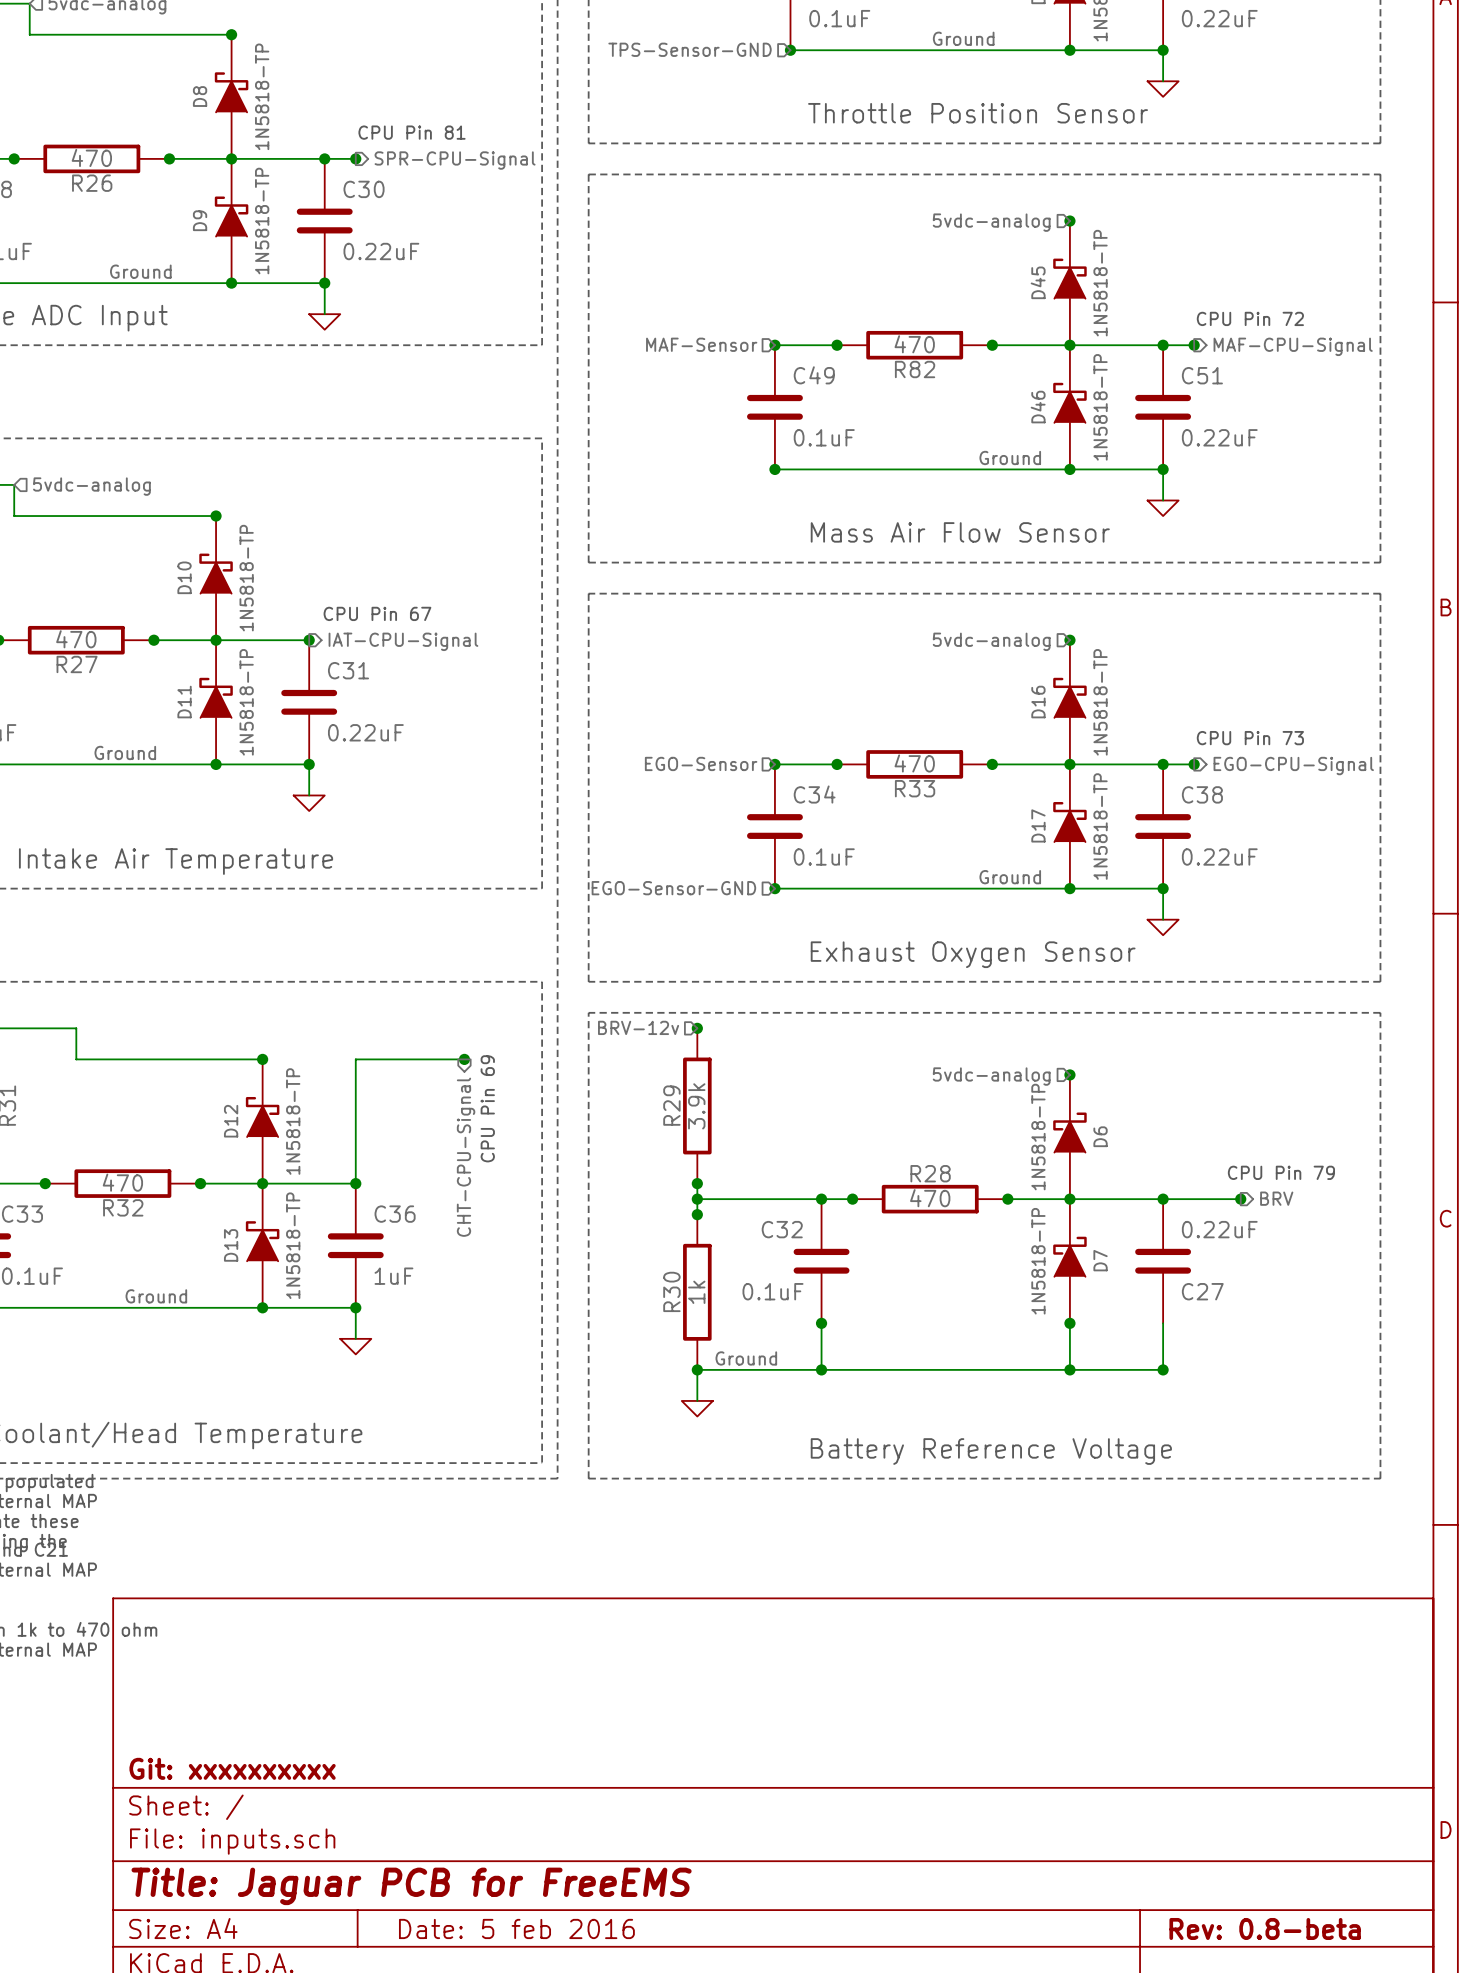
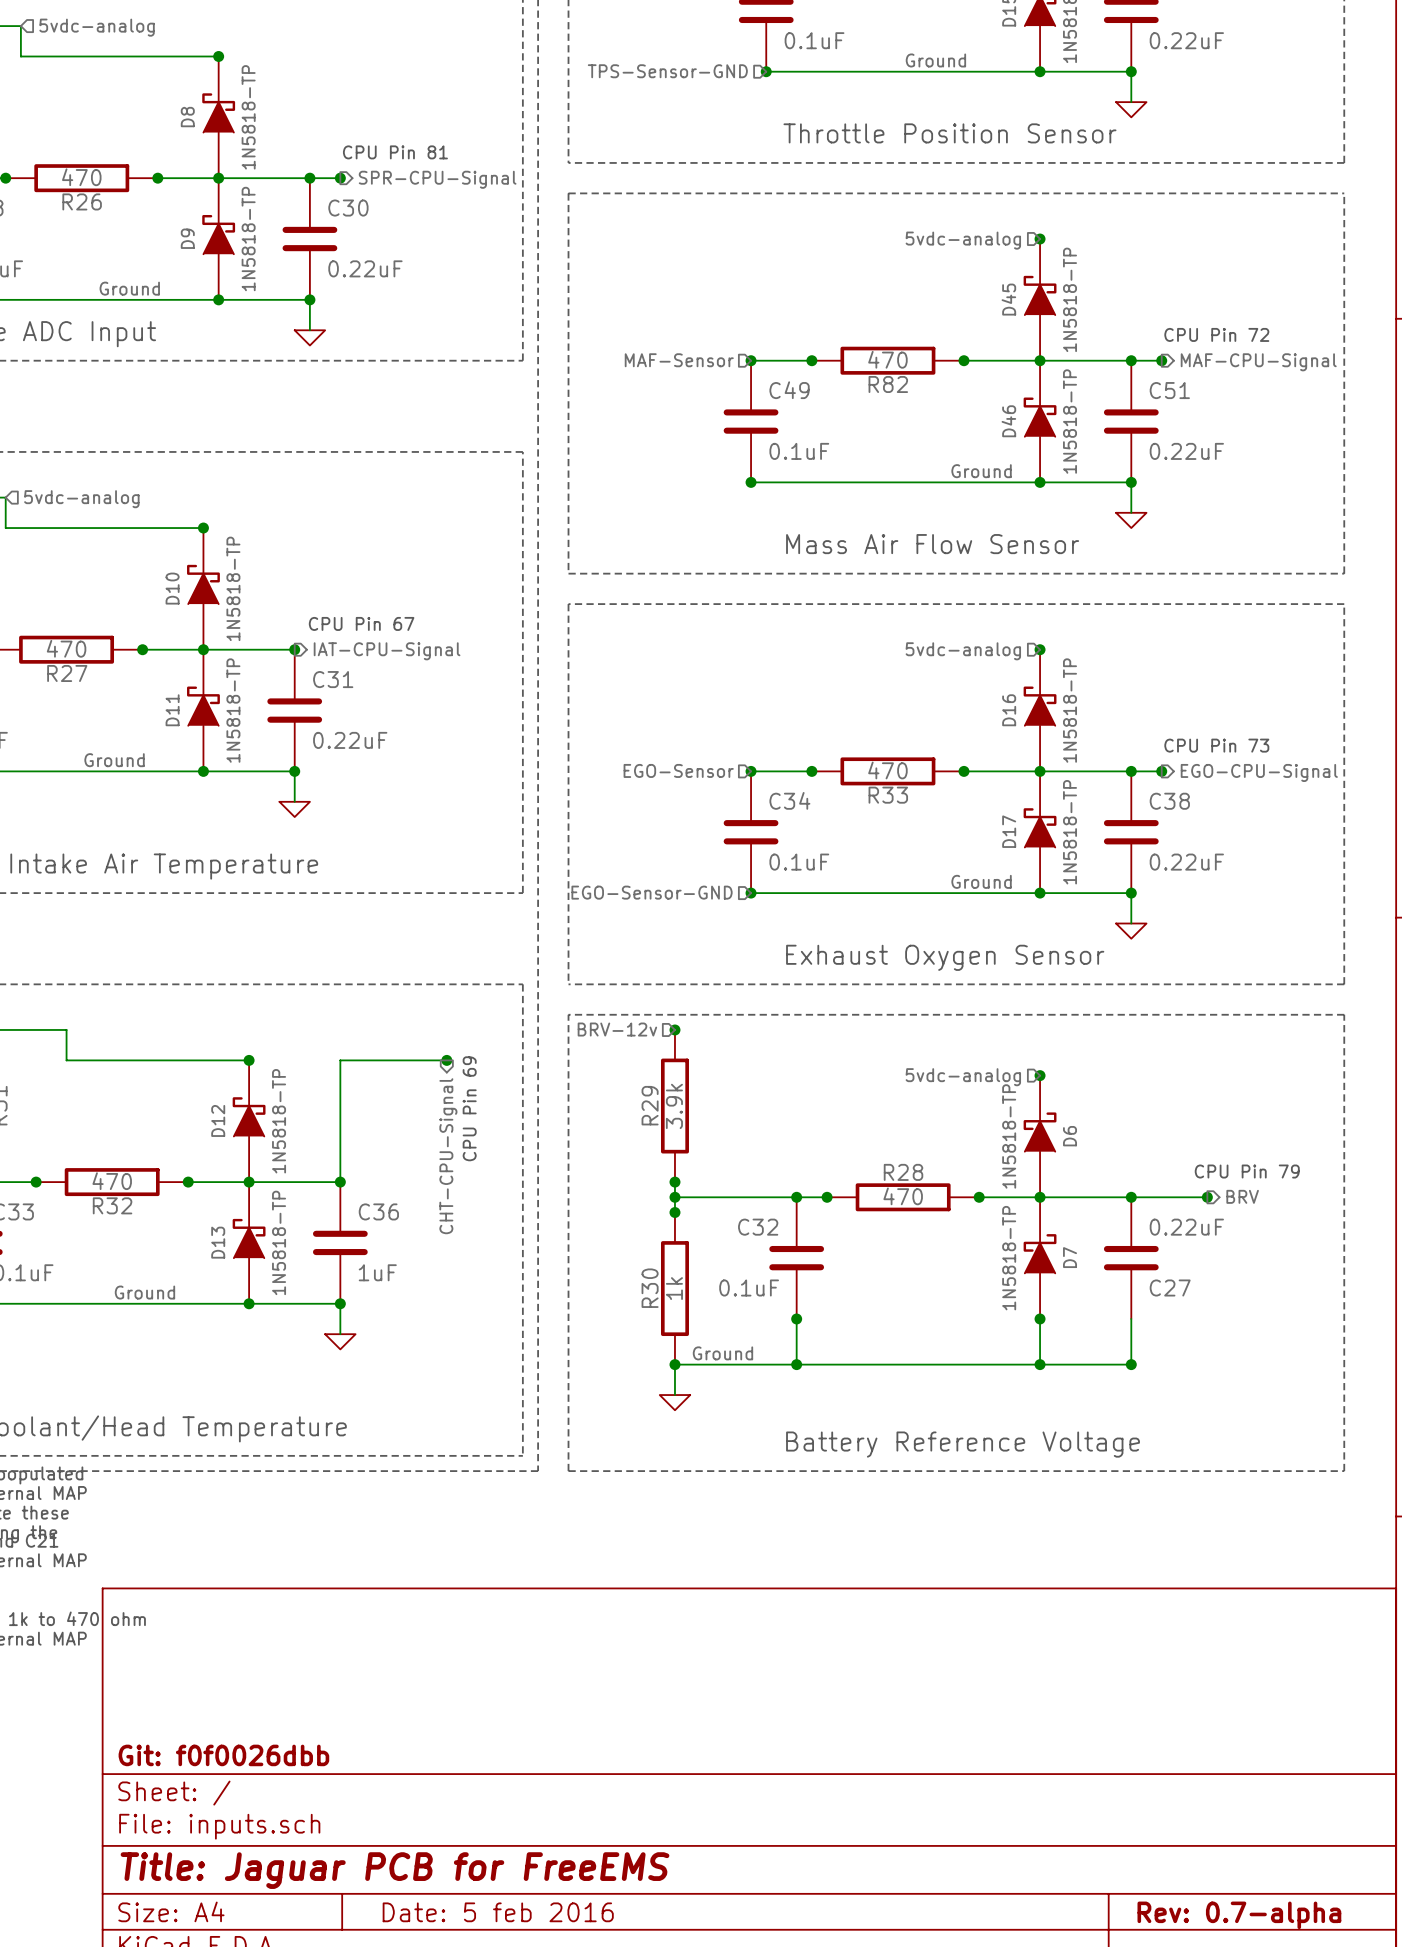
title block: Git: xxxxxxxxxx (232, 1768) -> Git: f0f0026dbb (223, 1755)
title block: Rev: 0.8-beta (1265, 1928) -> Rev: 0.7-alpha (1239, 1915)

